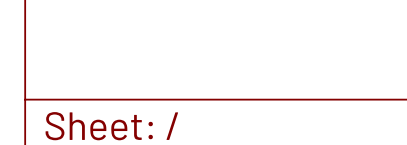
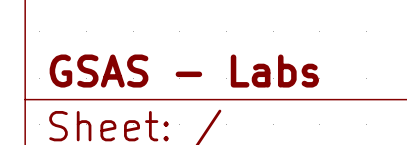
title block: none -> GSAS - Labs (184, 71)

